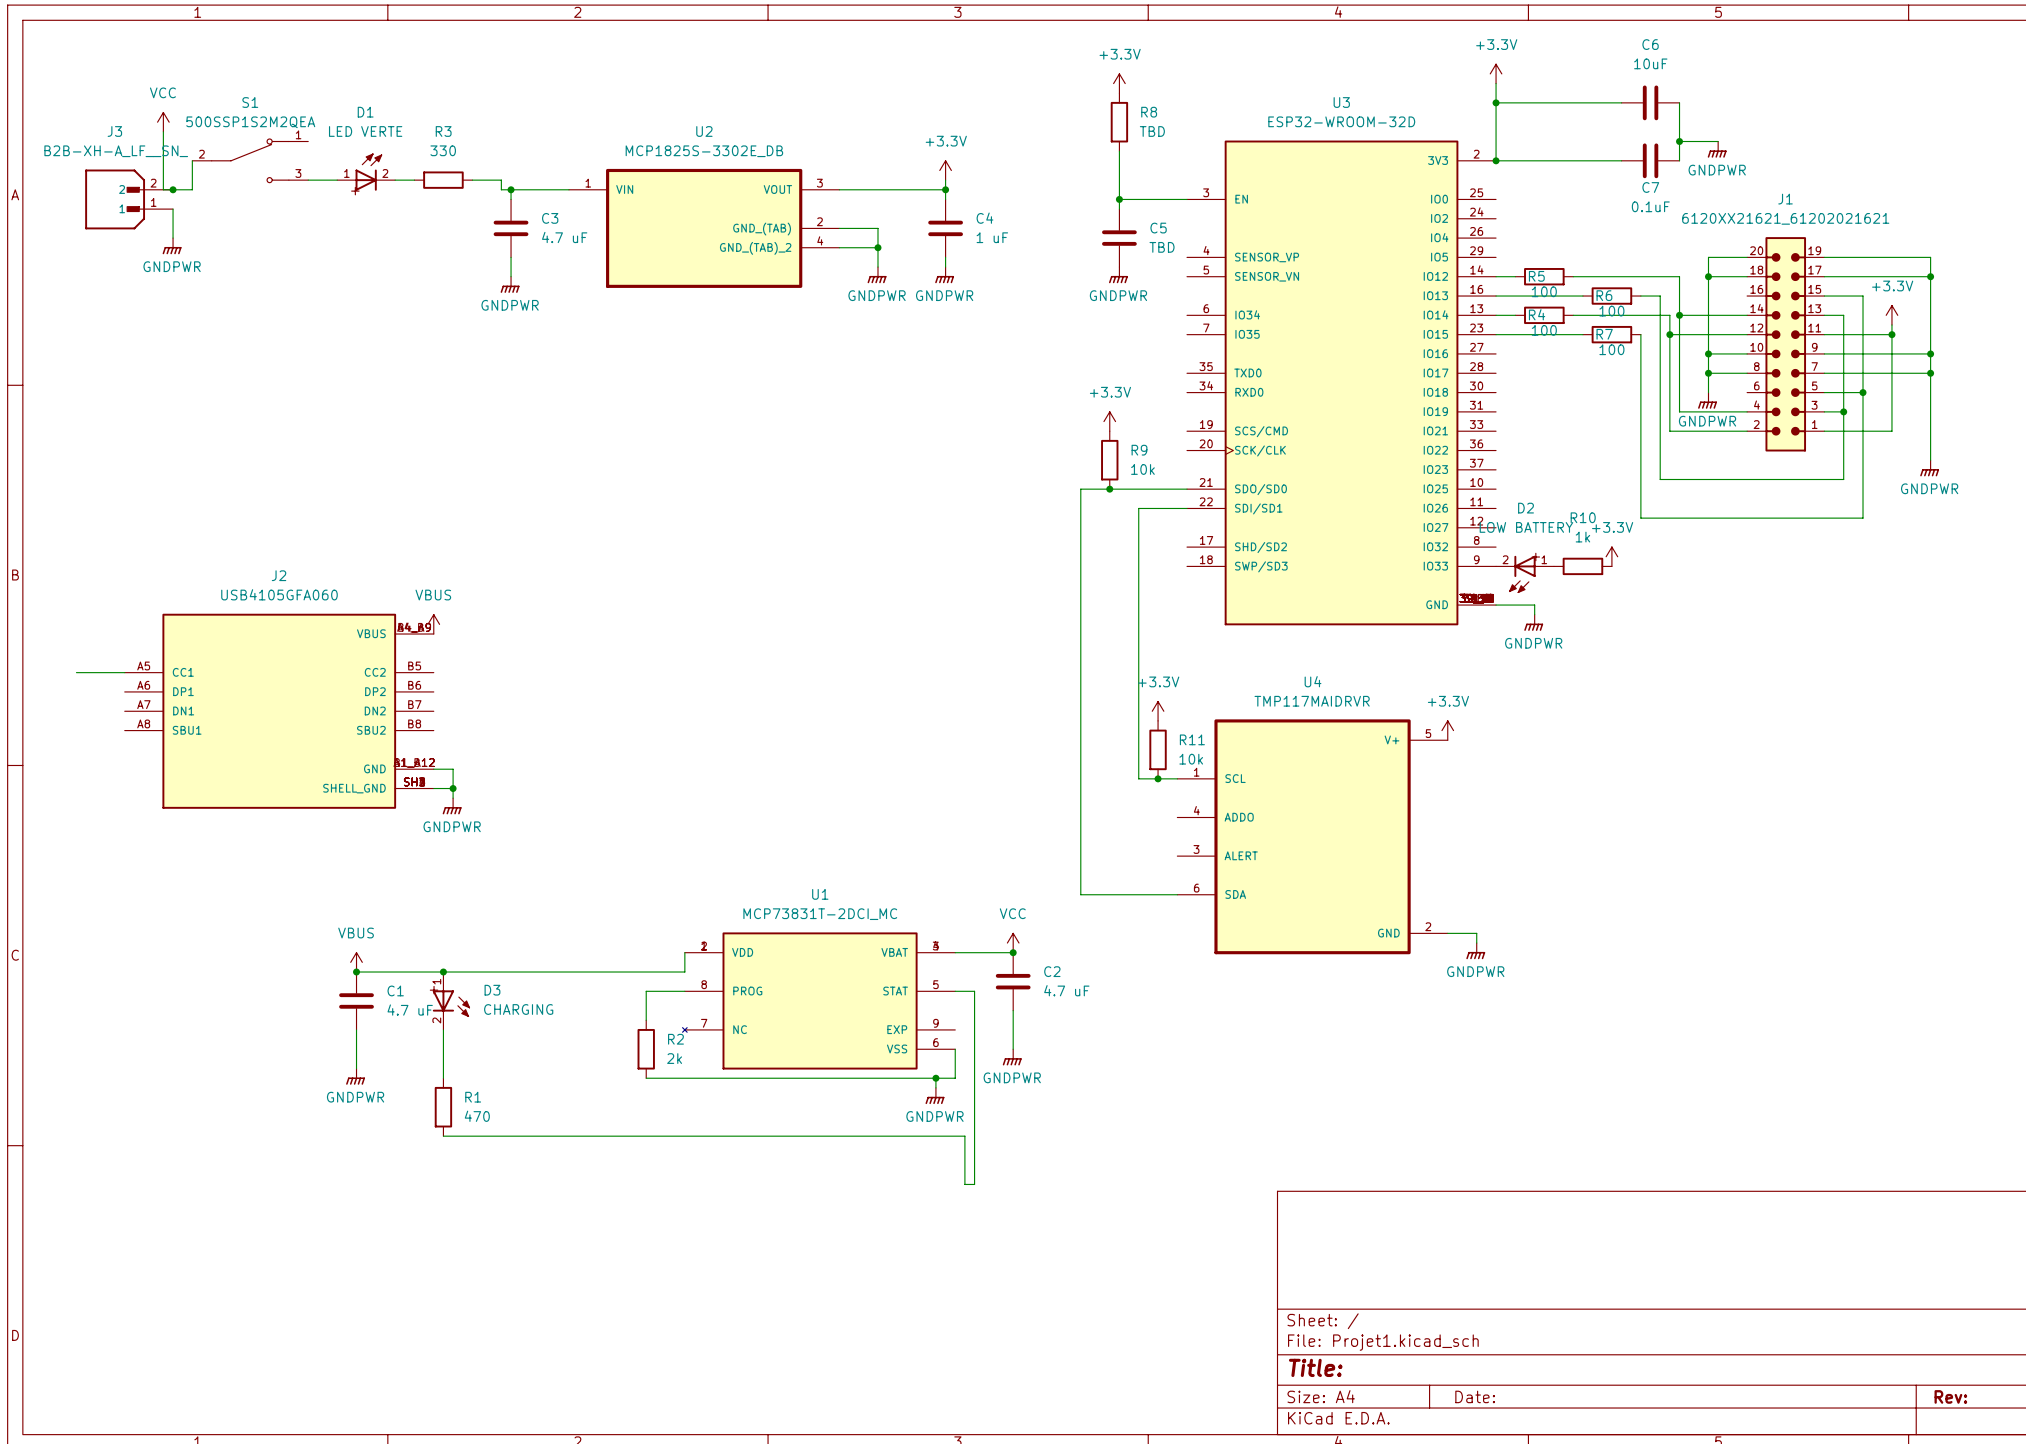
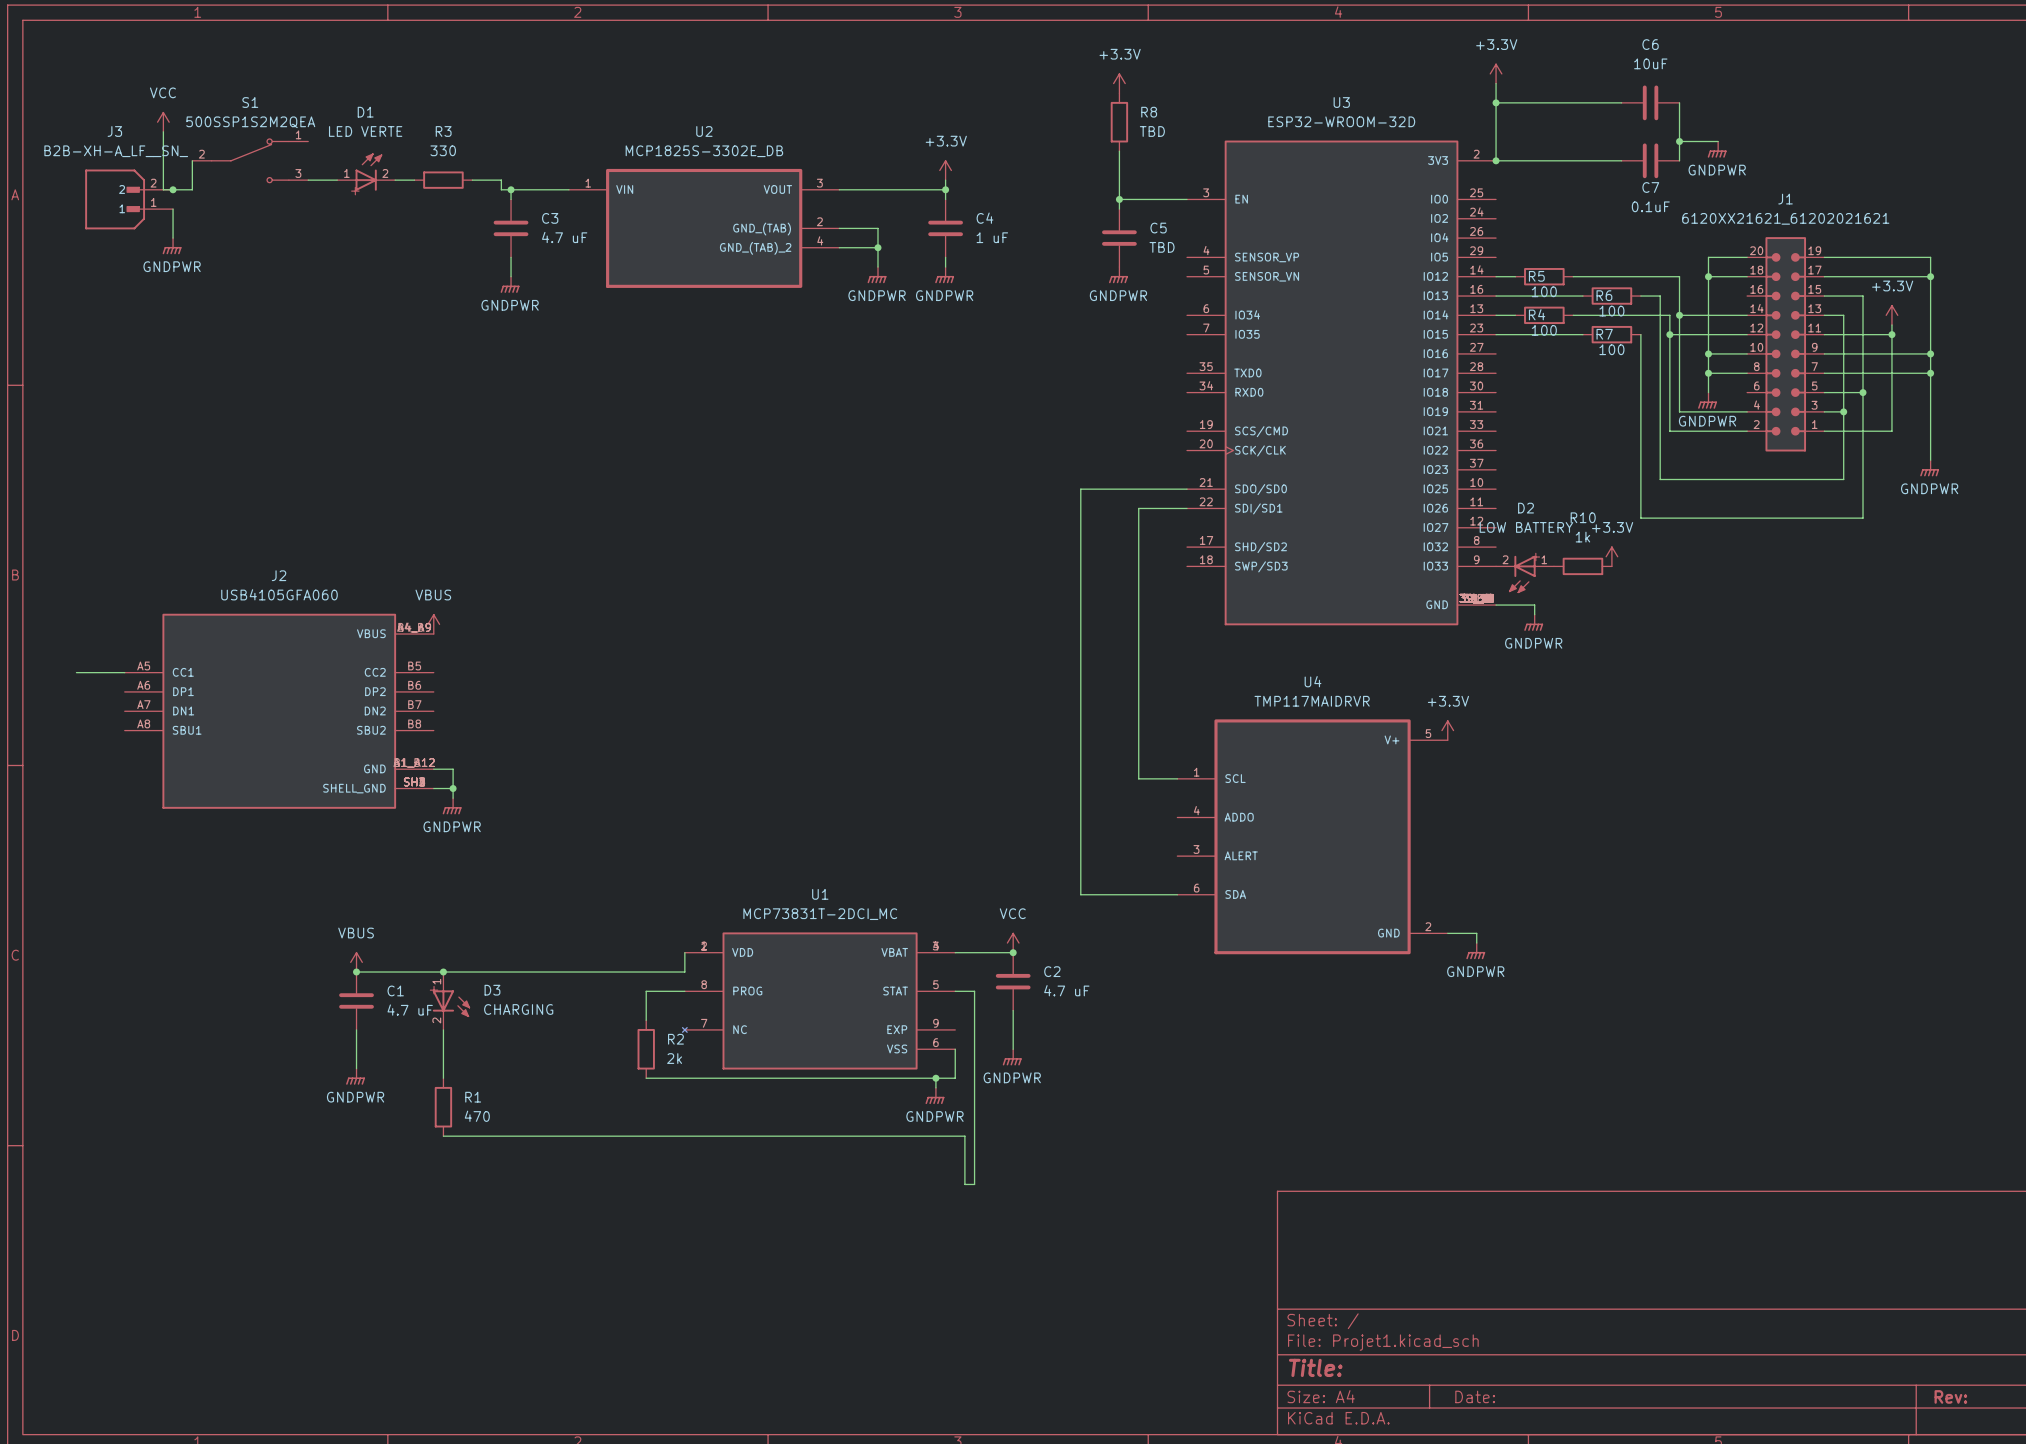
power symbol: +3.3V (1109, 421) -> none
R9: 10k (1109, 460) -> none
junction: (1109, 489) -> none
power symbol: +3.3V (1158, 711) -> none
R11: 10k (1158, 749) -> none
junction: (1158, 778) -> none

